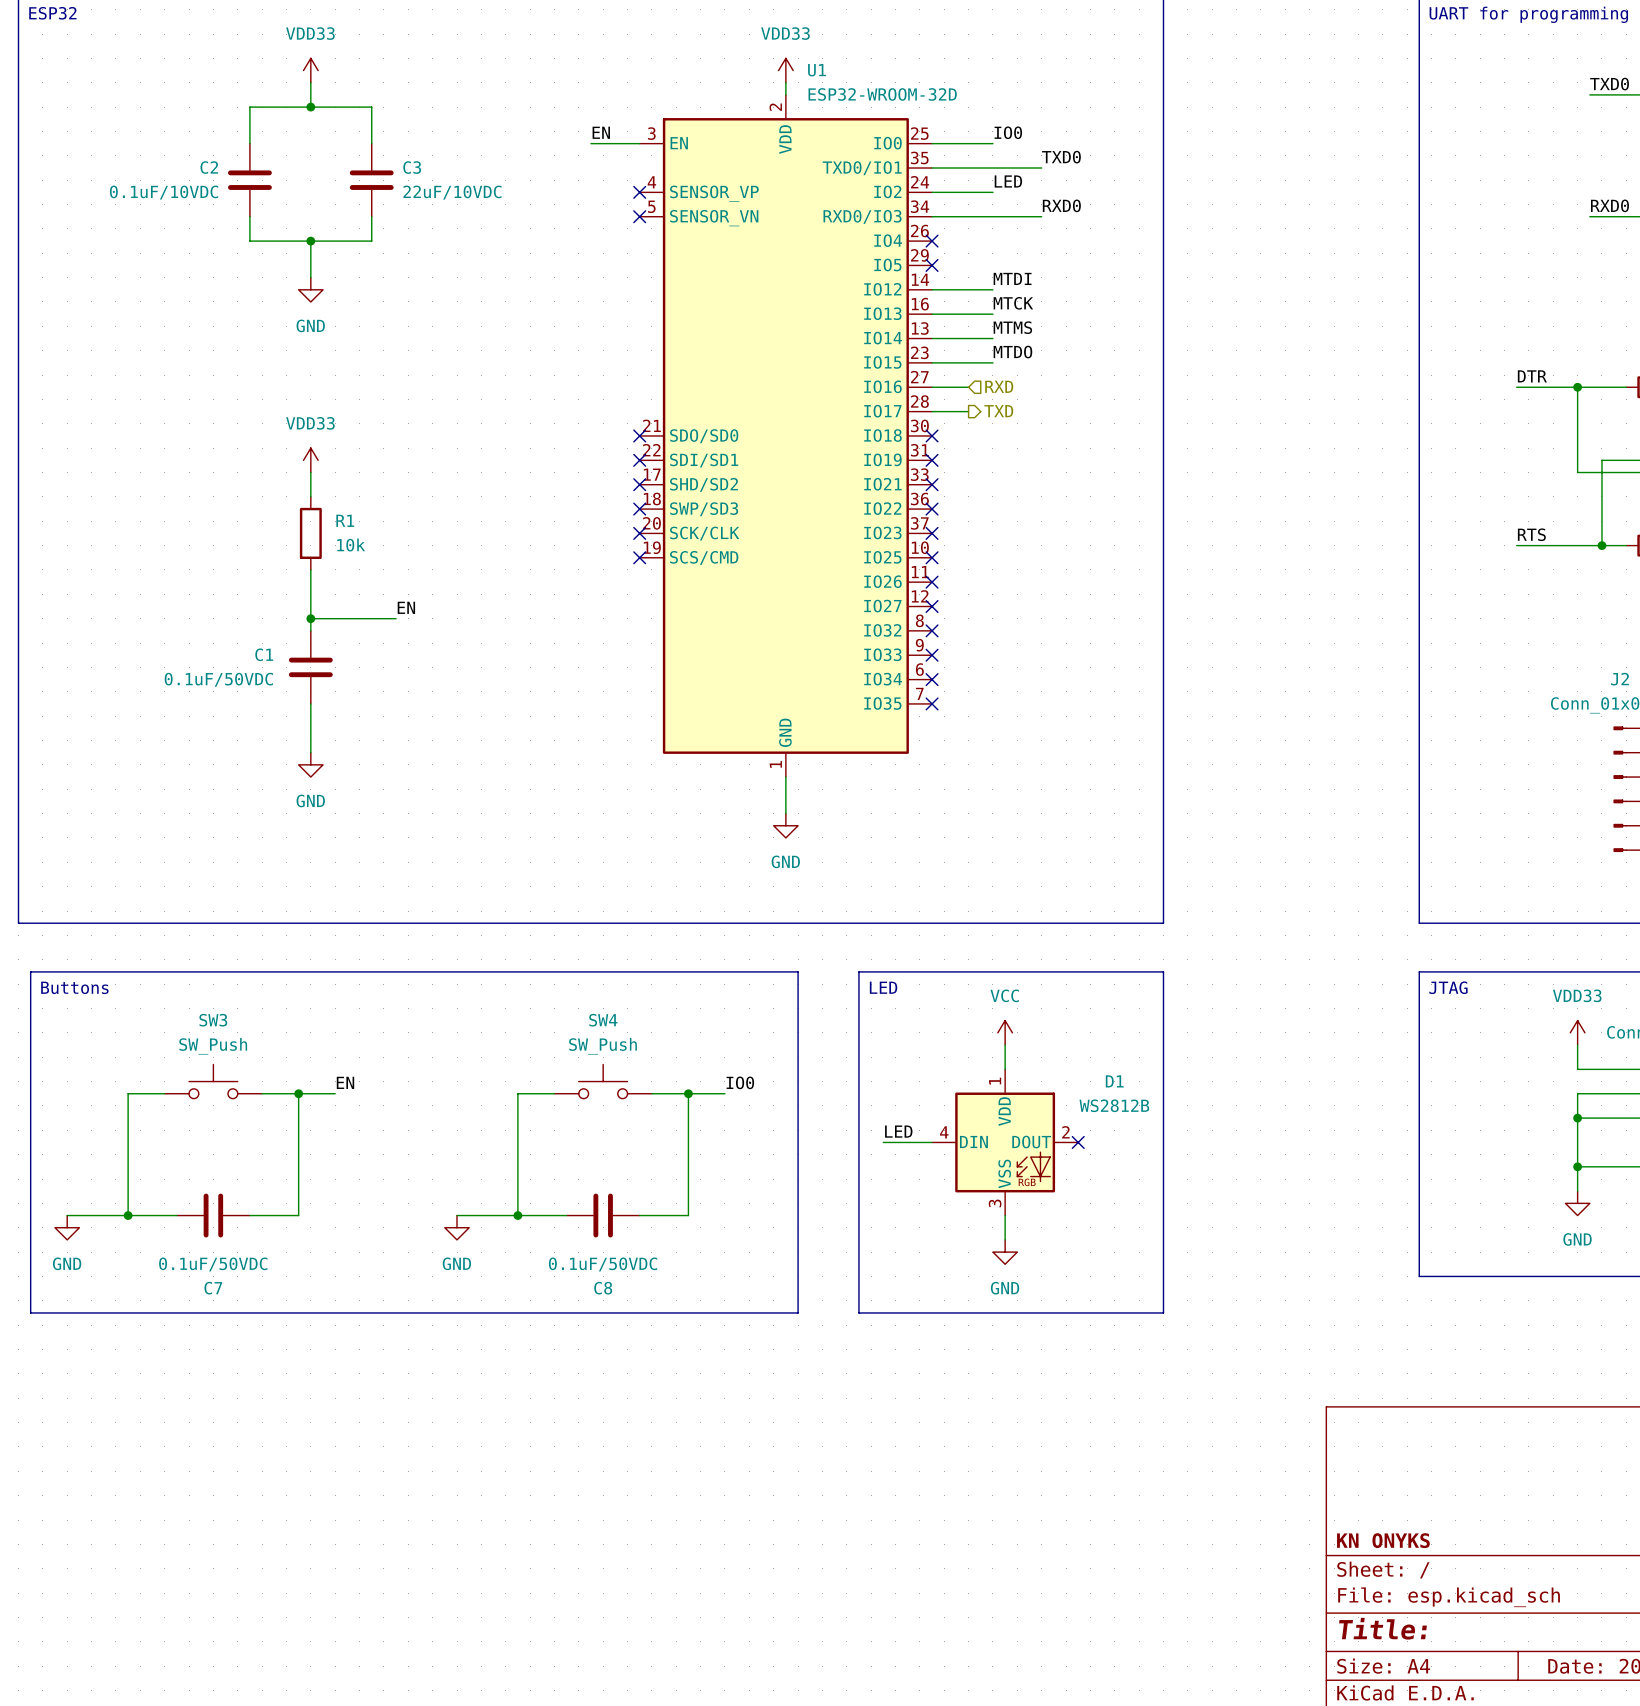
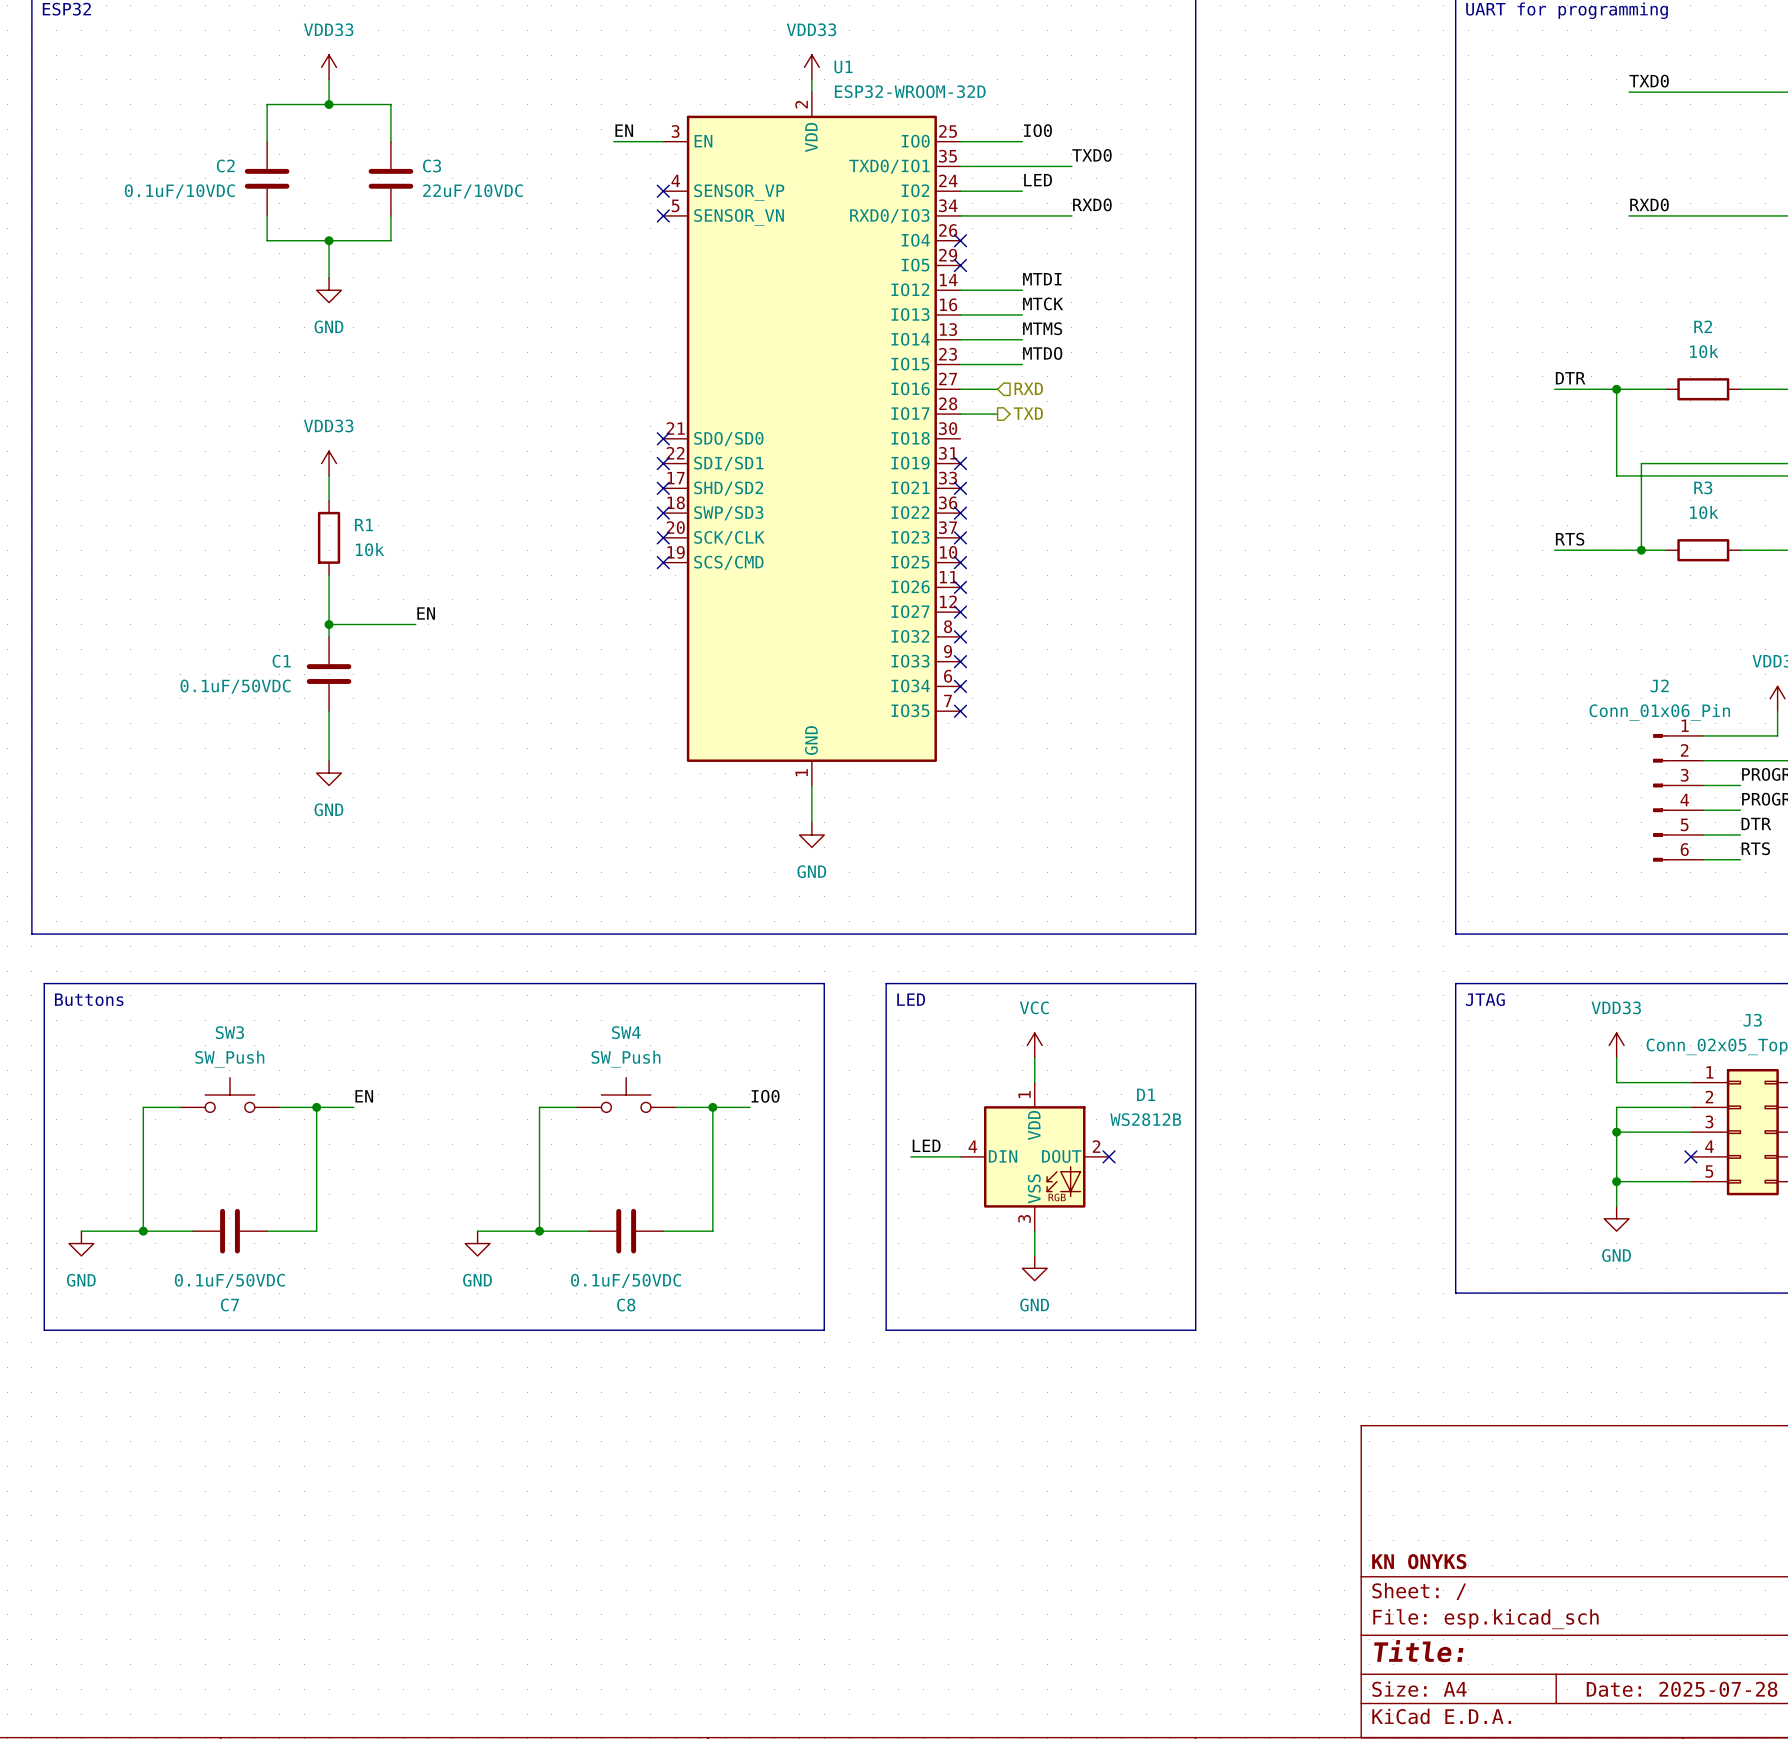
no-connect mark: (932, 435) -> none

